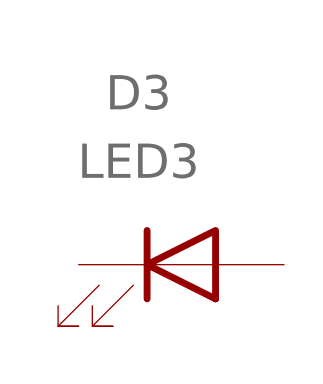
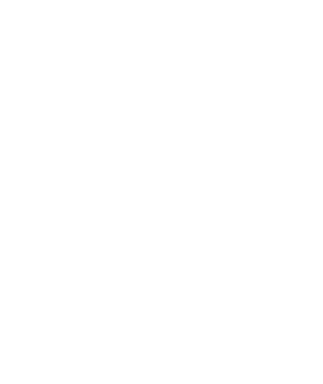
D3: LED3 (171, 276) -> none

